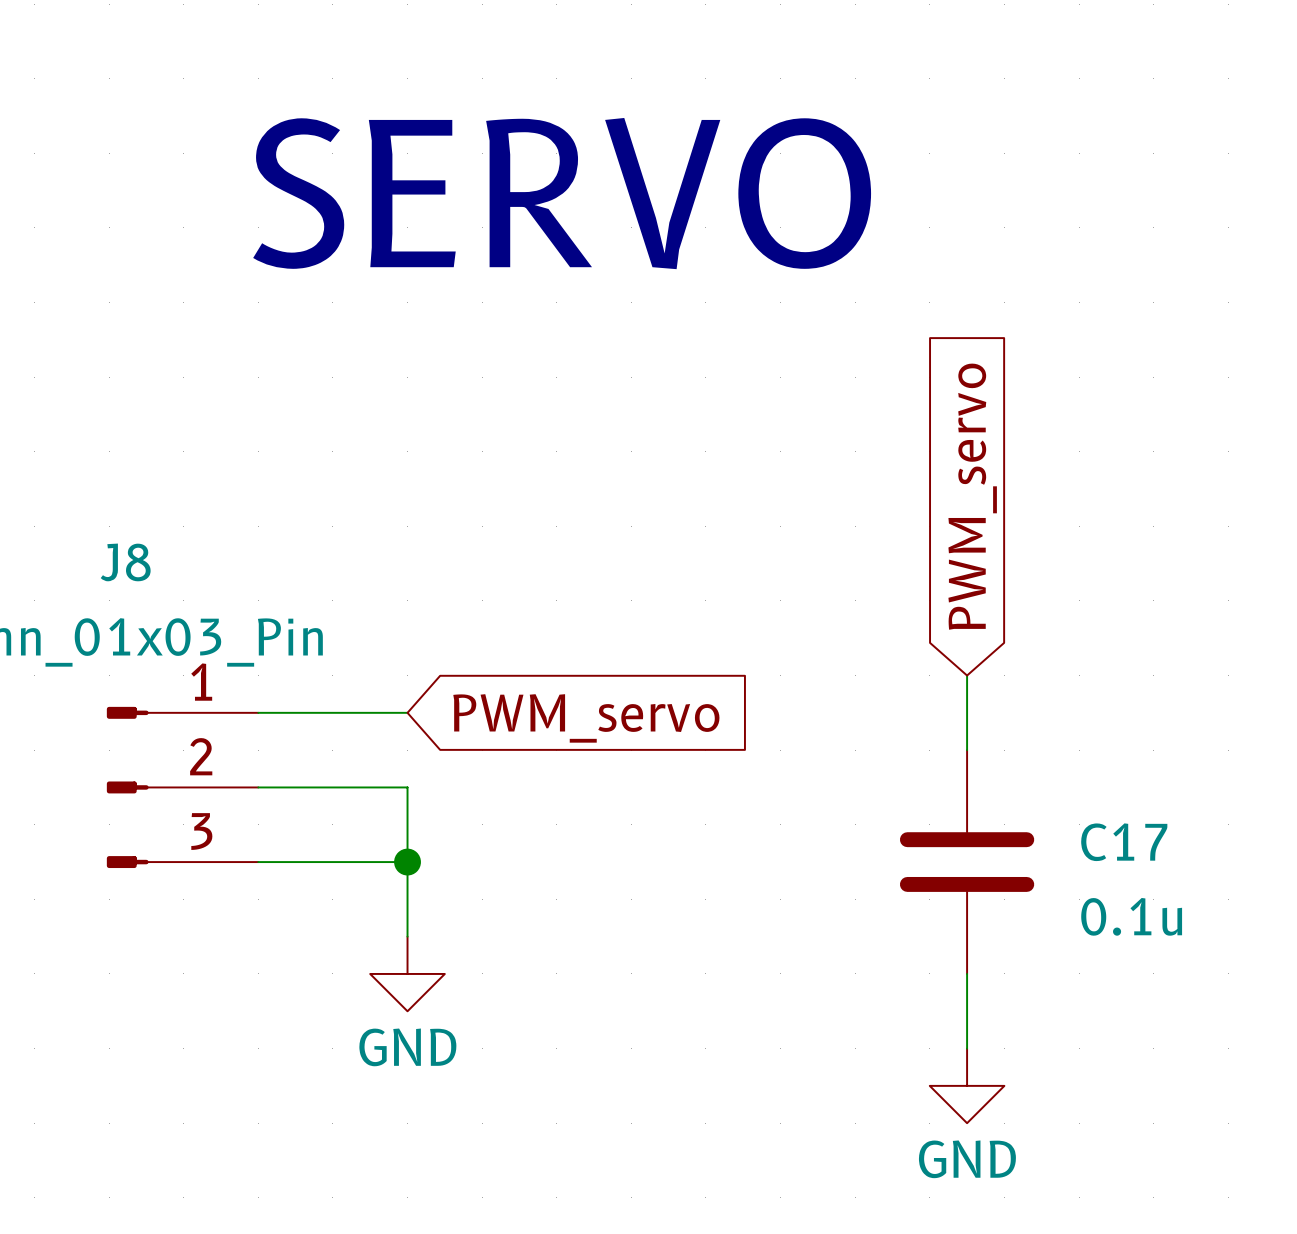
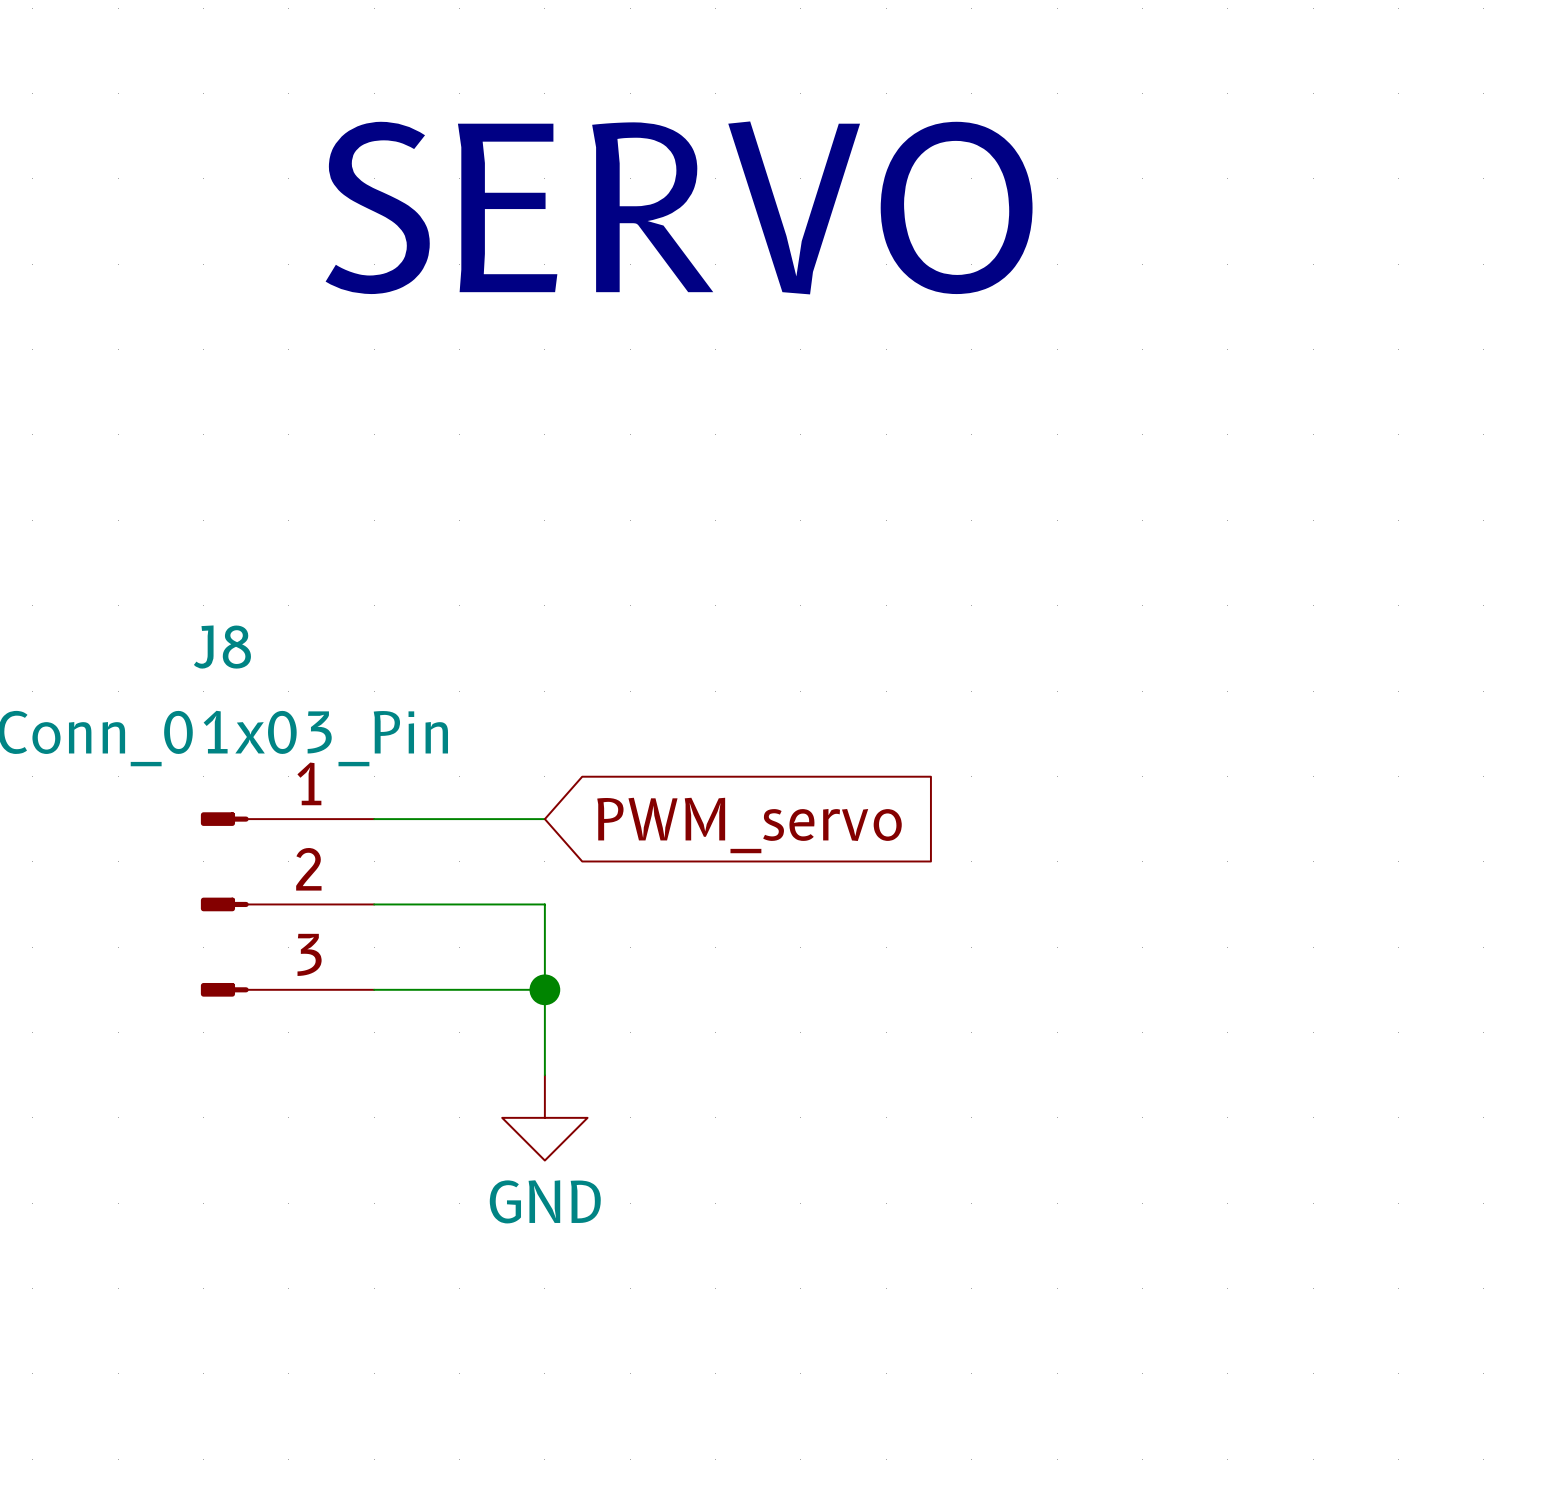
text position: SERVO (562, 193) -> SERVO (679, 207)
global label: PWM_servo (972, 496) -> none
wire: (967, 675) (967, 750) -> none
C17: 0.1u (967, 862) -> none
wire: (967, 973) (967, 1048) -> none
power symbol: GND (967, 1085) -> none

